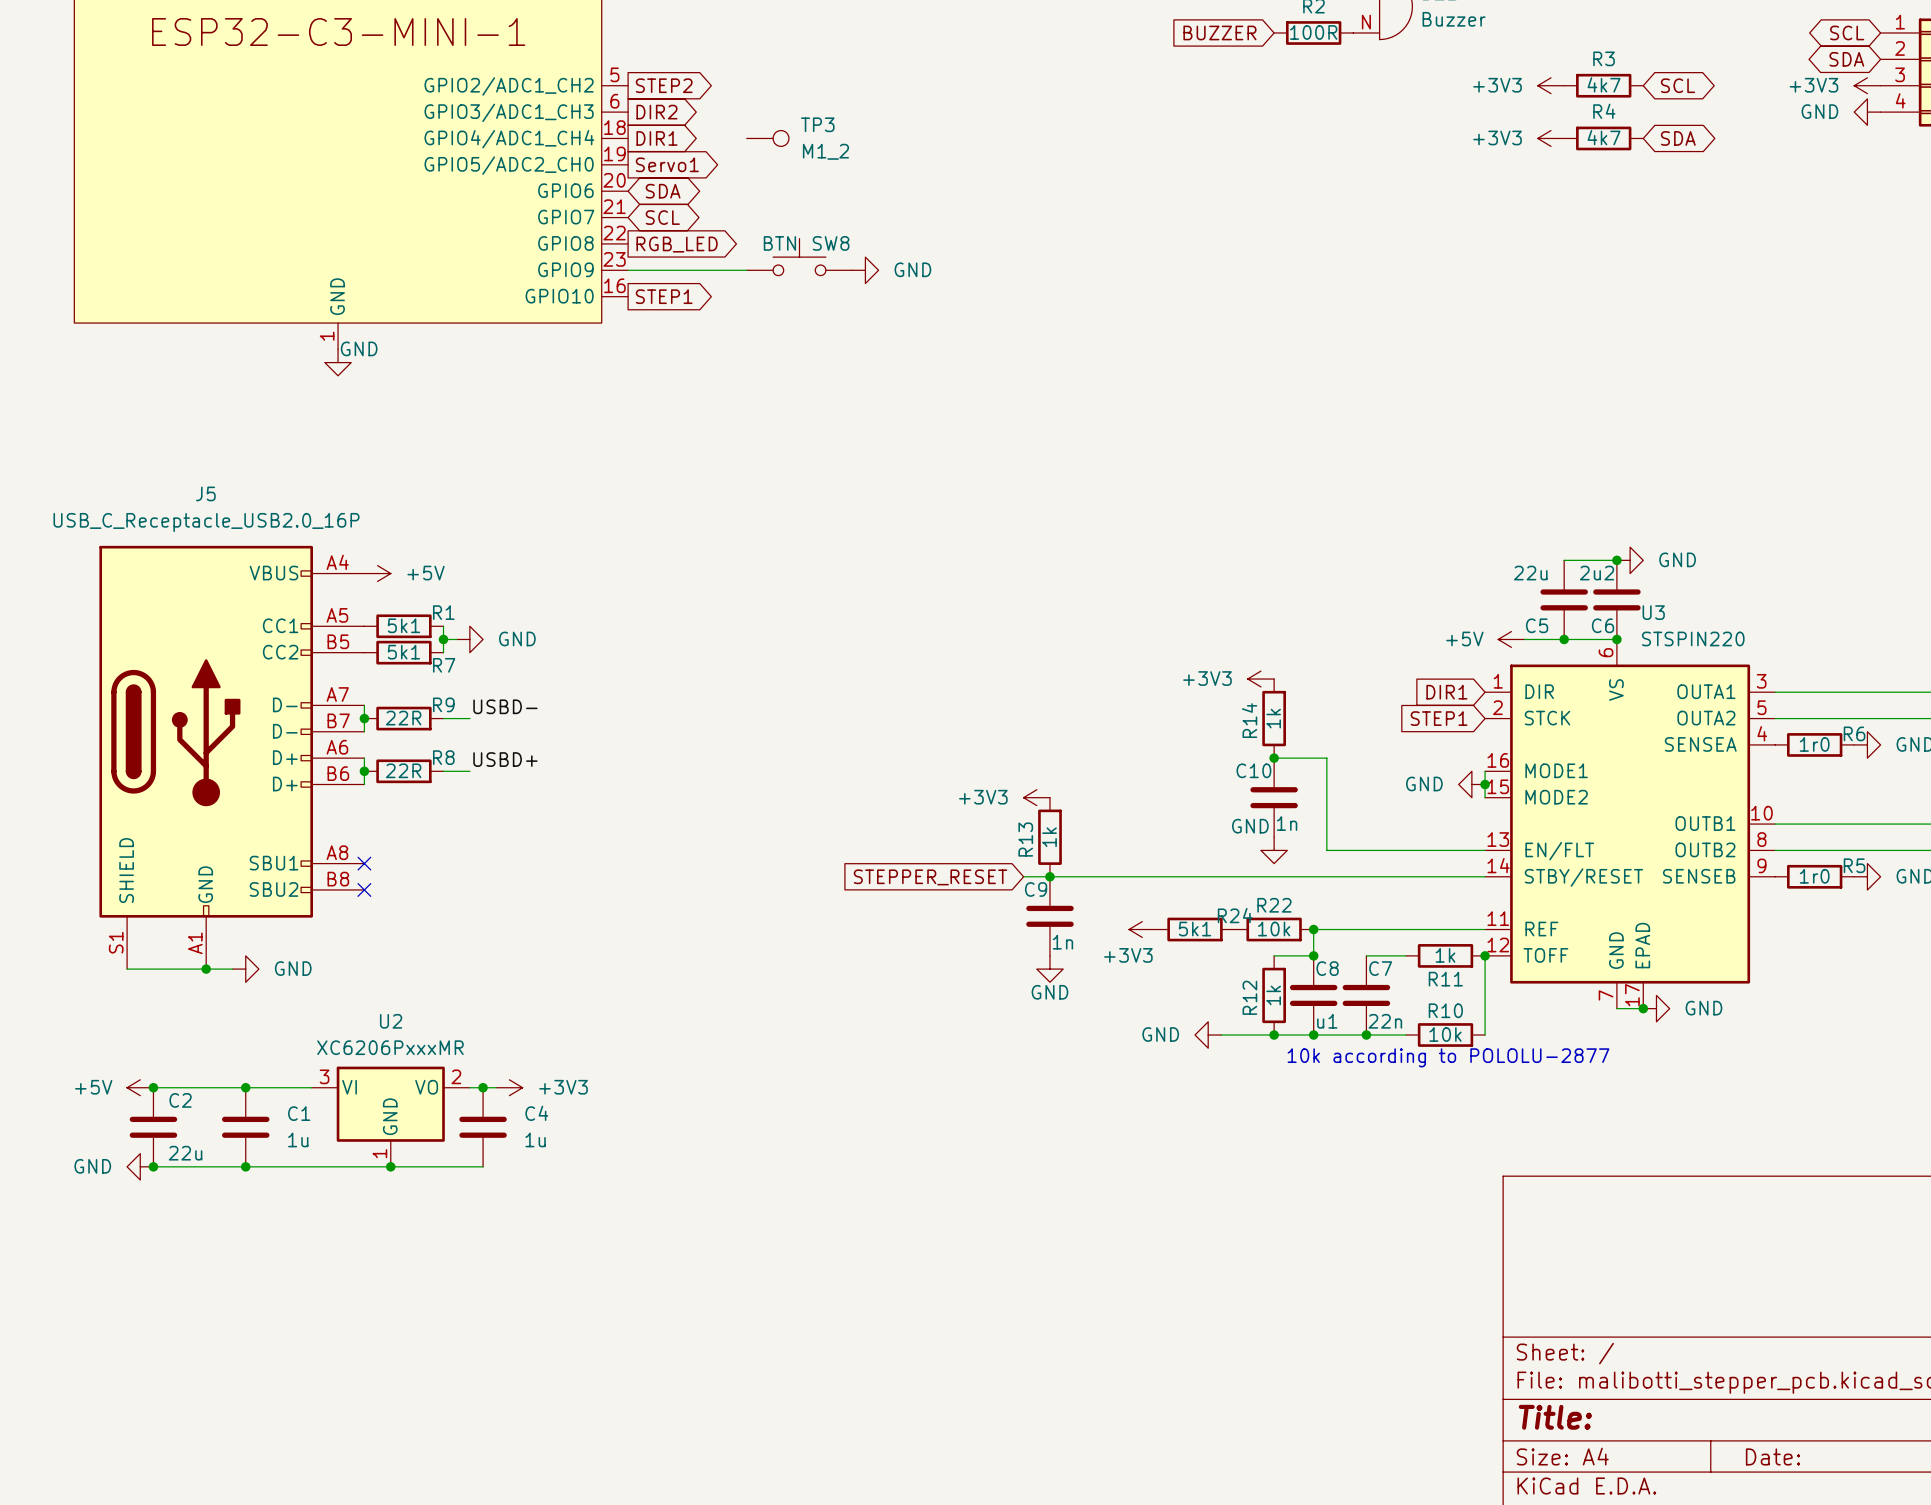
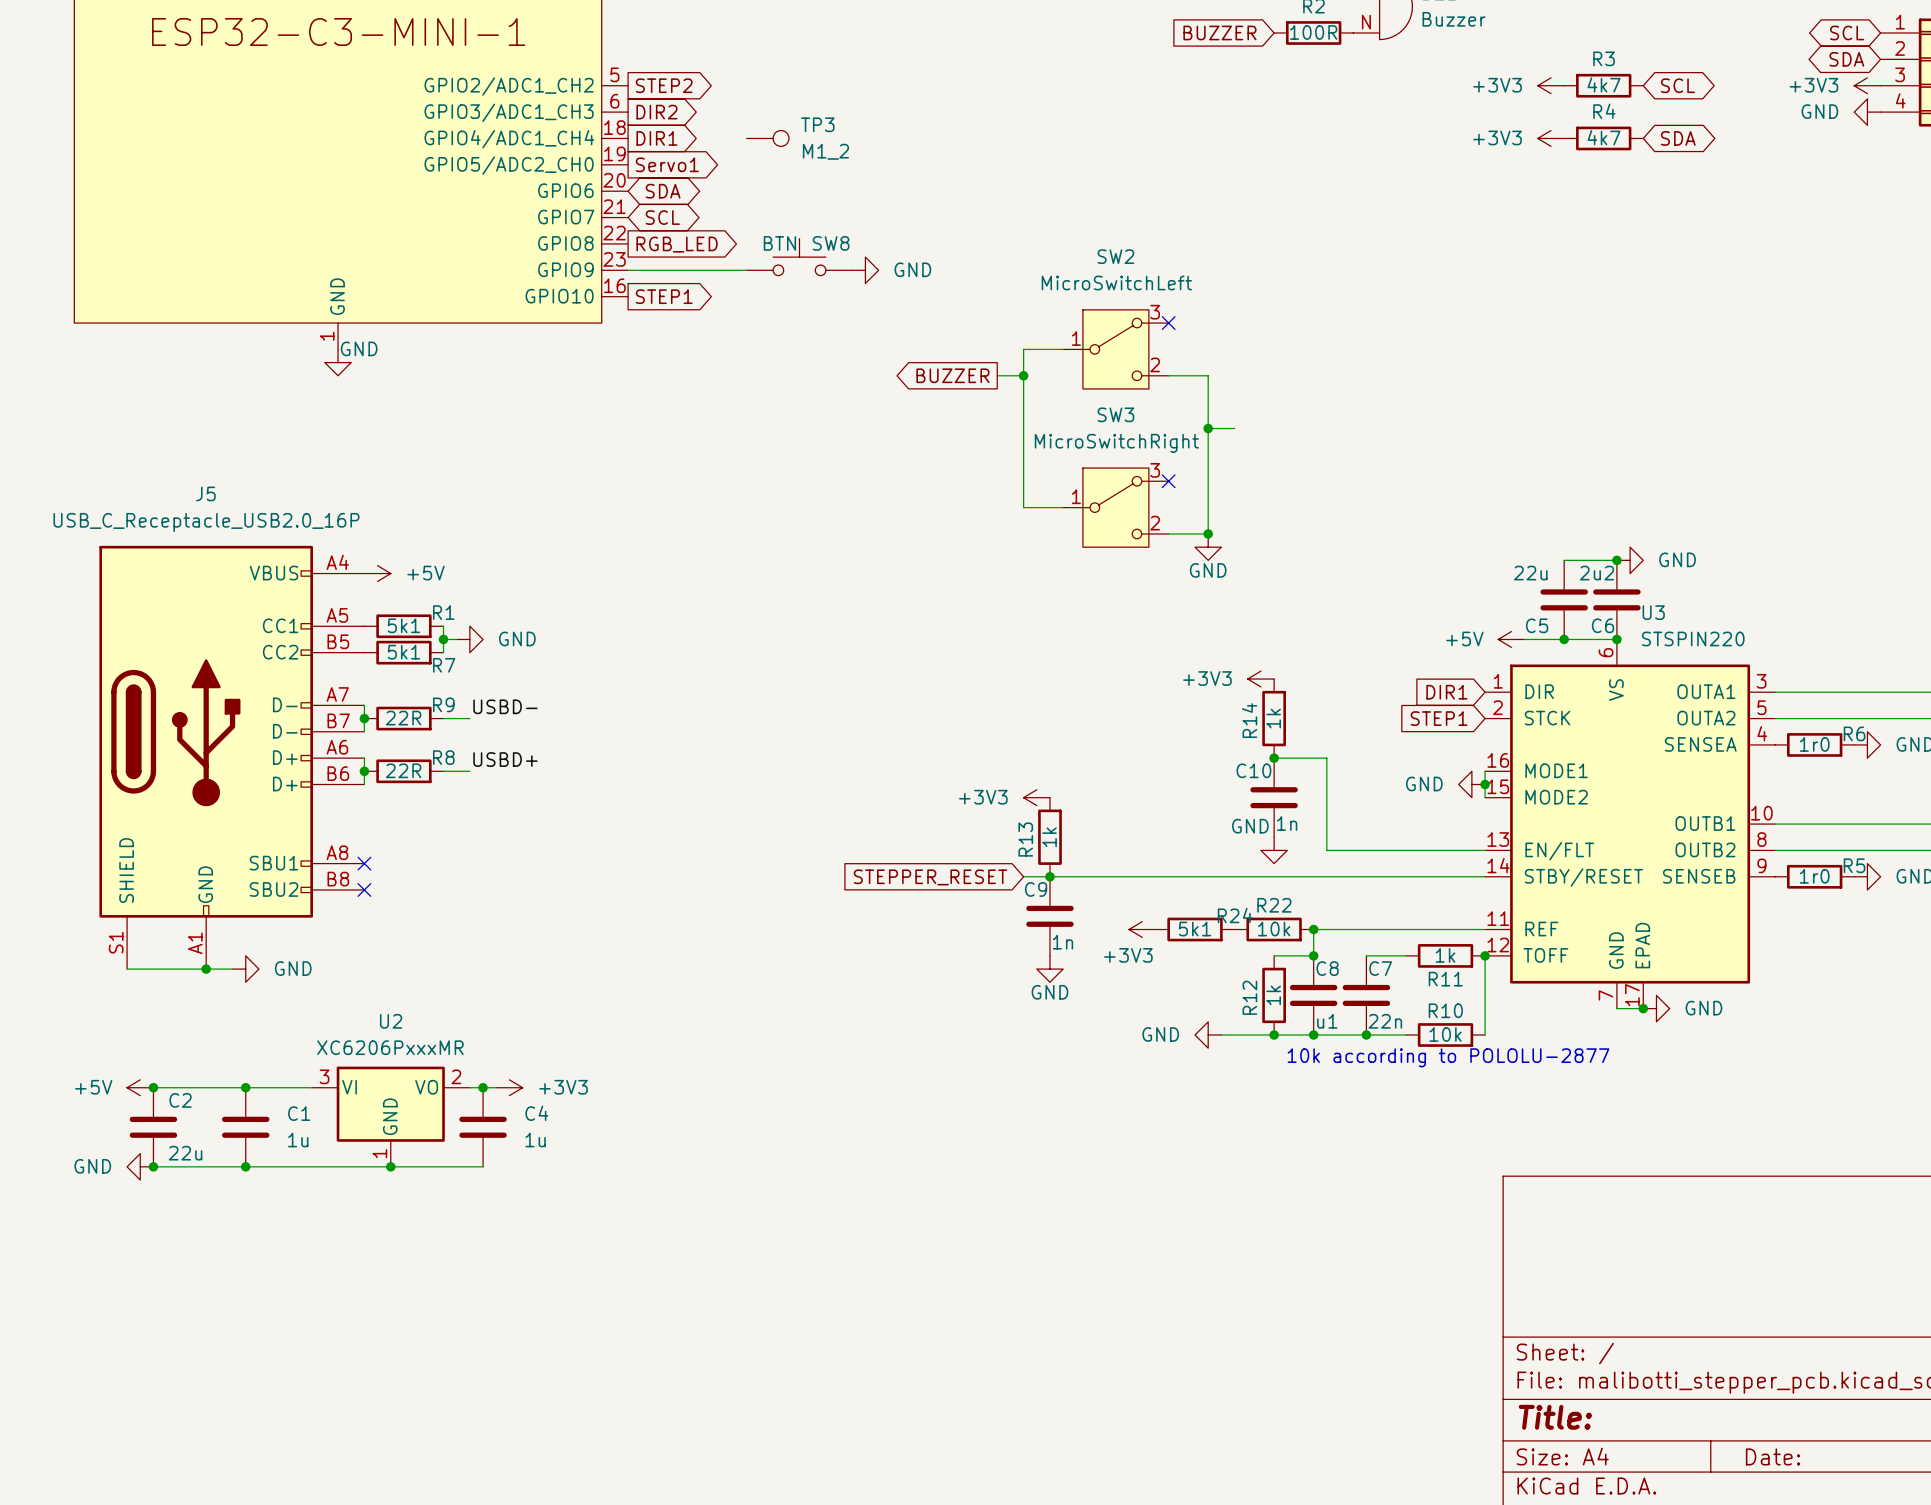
no-connect mark: none -> (1168, 323)
wire: none -> (1063, 349) (1023, 349) (1023, 507) (1063, 507)
SW2: none -> MicroSwitchLeft (1115, 349)
global label: none -> BUZZER (952, 375)
wire: none -> (997, 375) (1023, 375)
junction: none -> (1023, 375)
wire: none -> (1168, 375) (1208, 375) (1208, 533) (1168, 533)
wire: none -> (1208, 428) (1234, 428)
junction: none -> (1208, 428)
no-connect mark: none -> (1168, 481)
SW3: none -> MicroSwitchRight (1115, 507)
junction: none -> (1208, 533)
power symbol: none -> GND (1208, 547)

